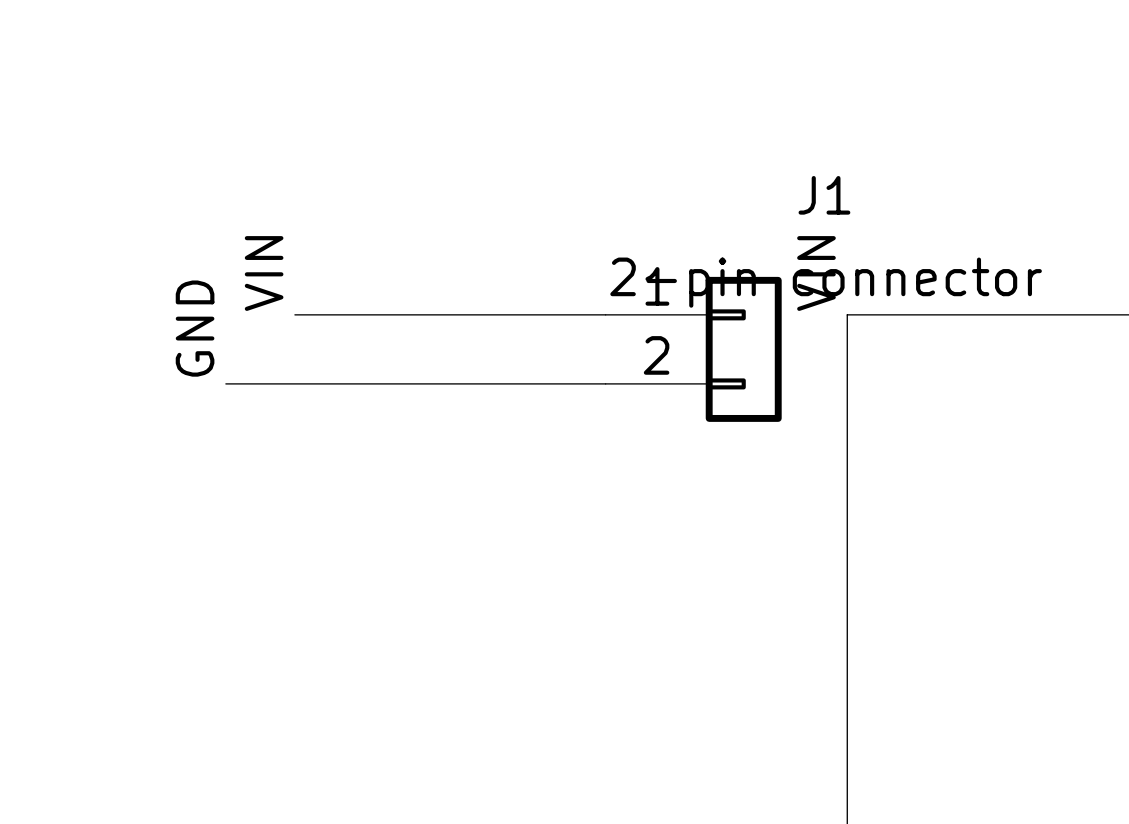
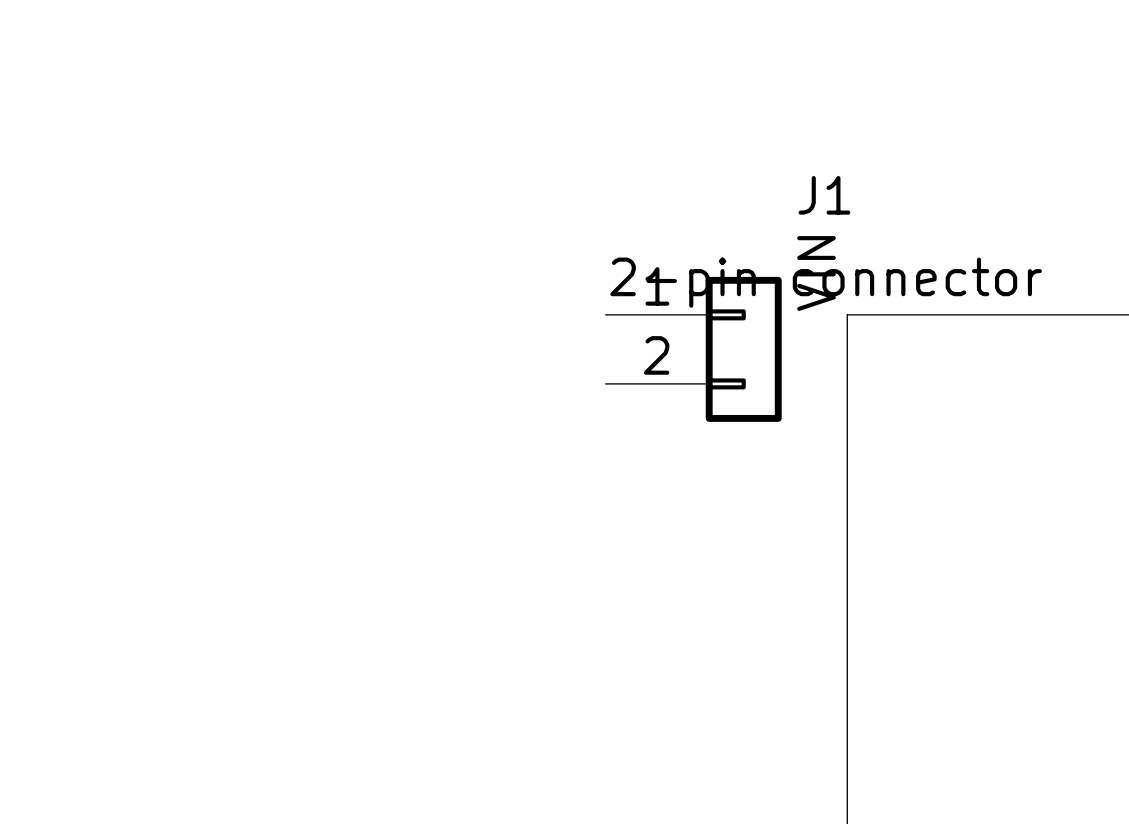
label: VIN (264, 273) -> none
wire: (294, 314) (605, 314) -> none
label: GND (195, 328) -> none
wire: (225, 383) (605, 383) -> none

